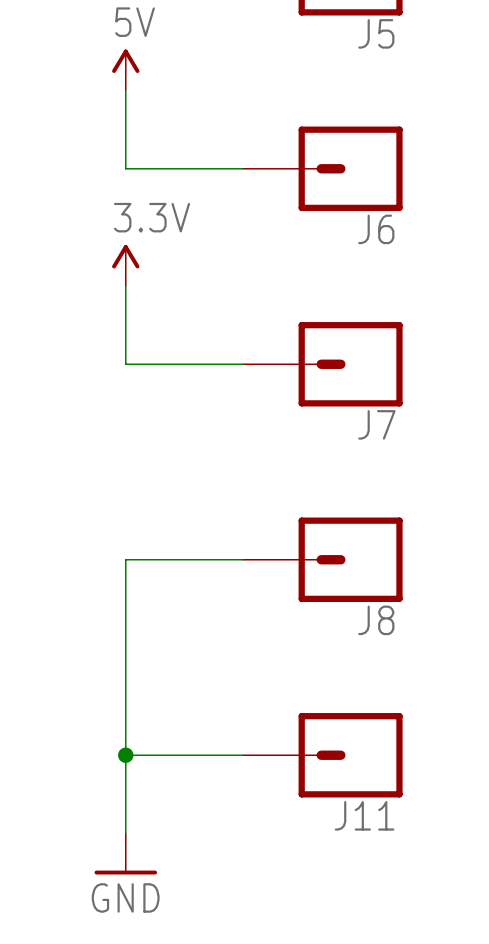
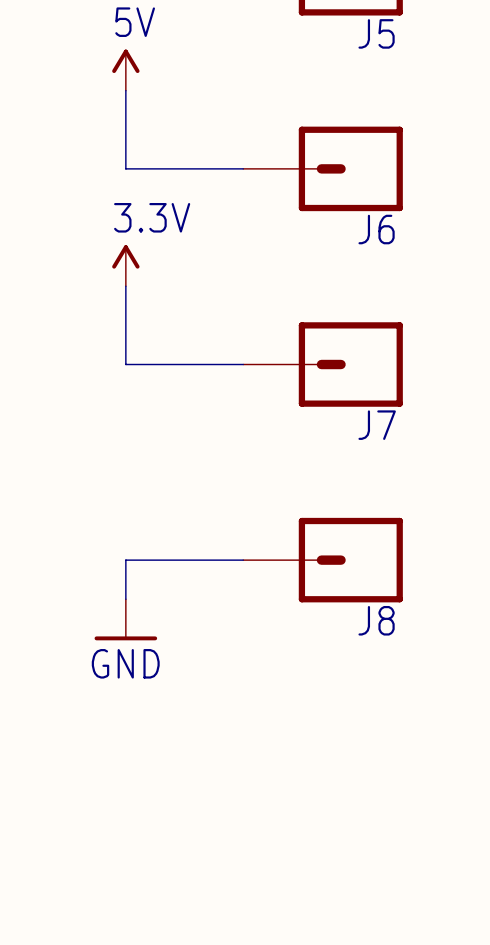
wire: (125, 598) (125, 833) -> none
wire: (125, 755) (243, 755) -> none
junction: (125, 755) -> none
J11: (322, 755) -> none
power symbol position: GND (125, 853) -> GND (125, 619)

